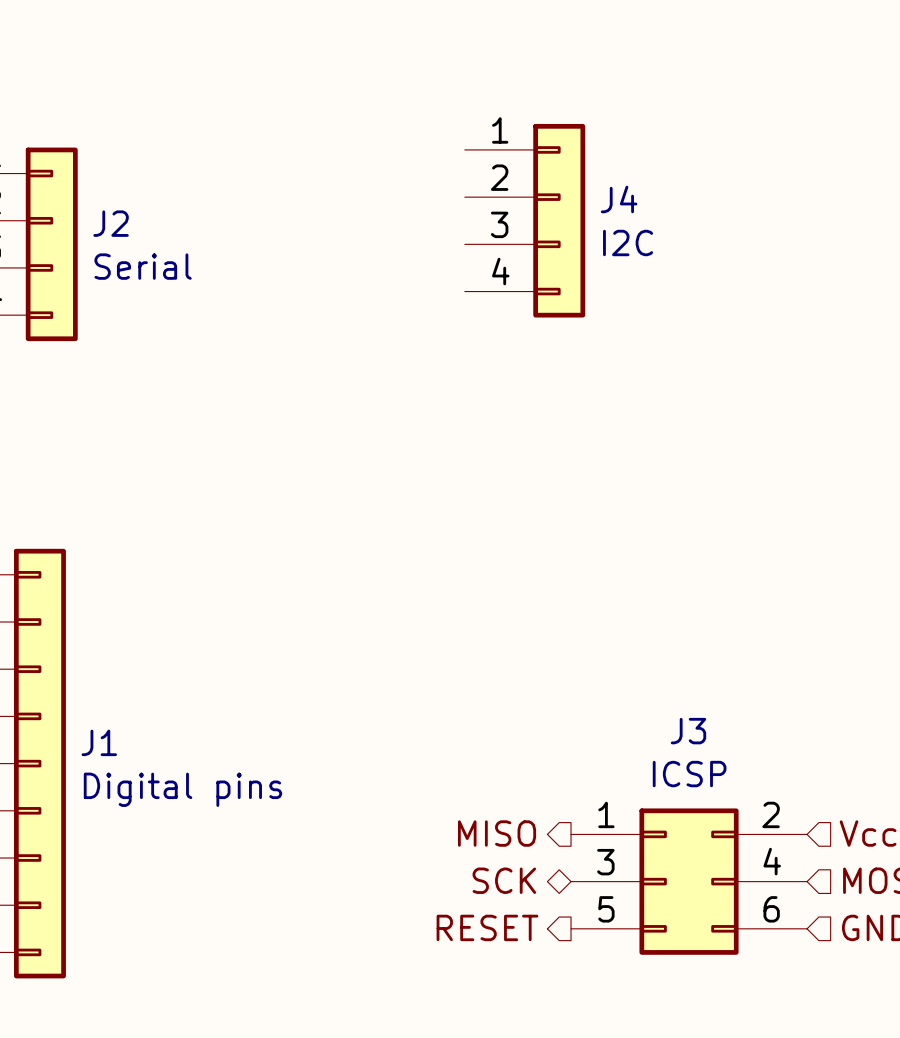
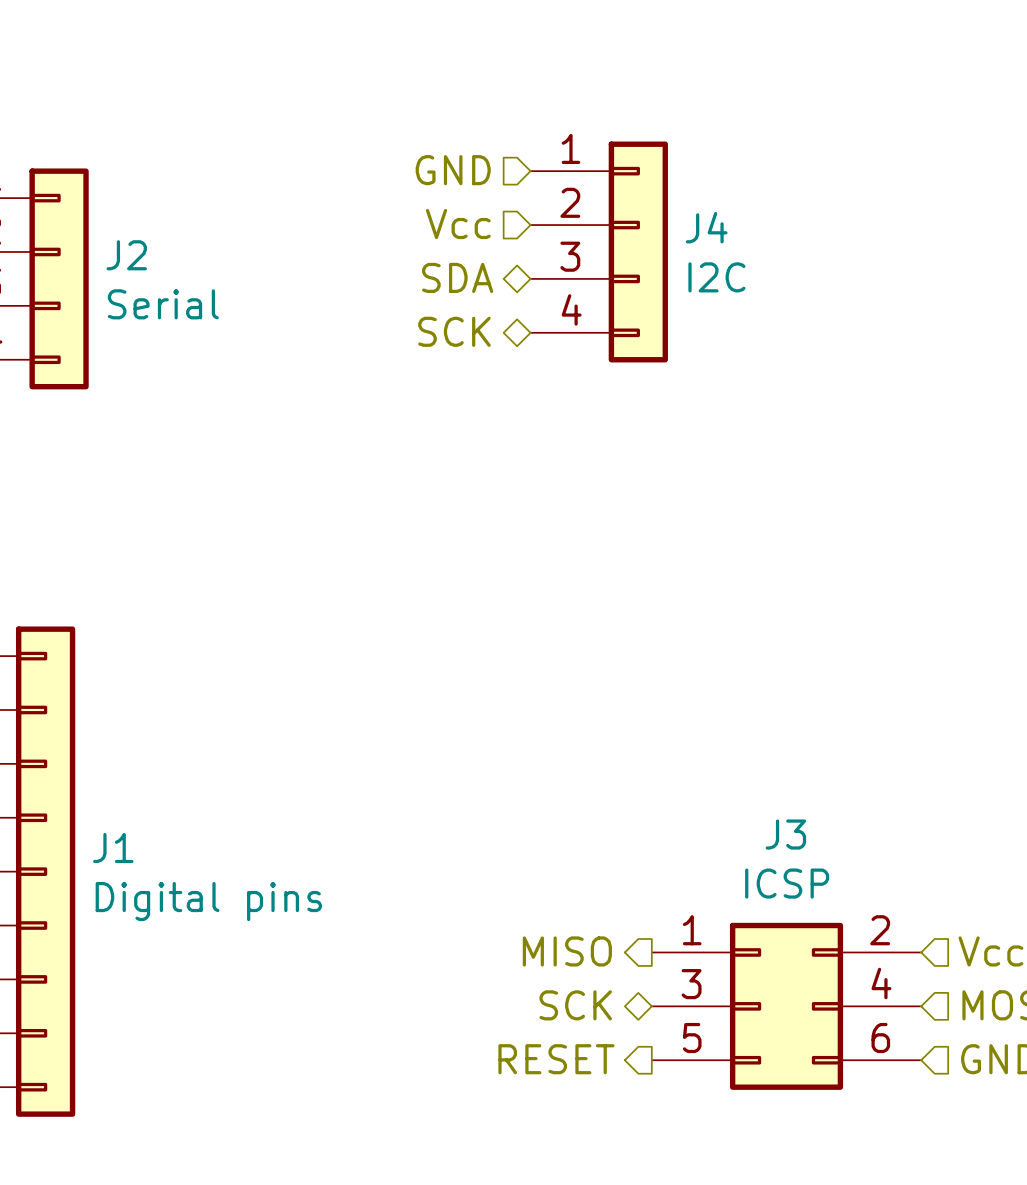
hierarchical label: none -> GND (453, 170)
hierarchical label: none -> Vcc (458, 224)
hierarchical label: none -> SDA (457, 277)
hierarchical label: none -> SCK (454, 331)

